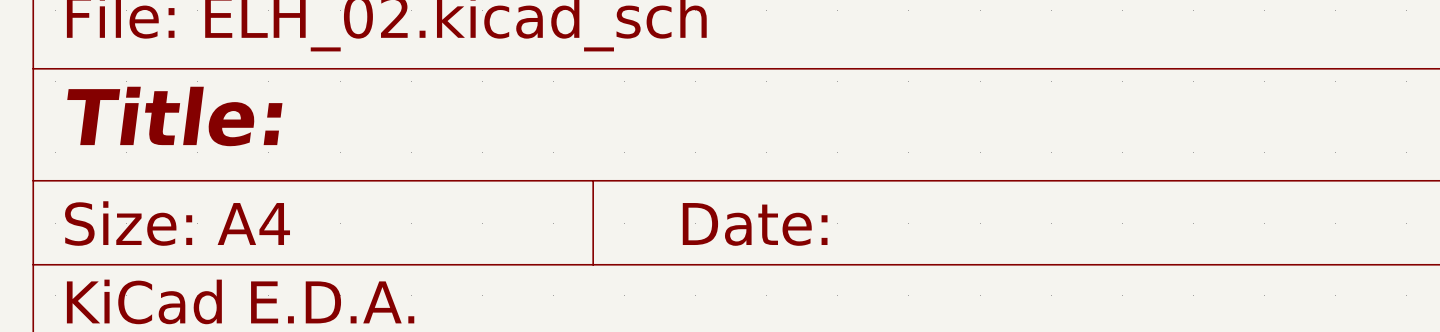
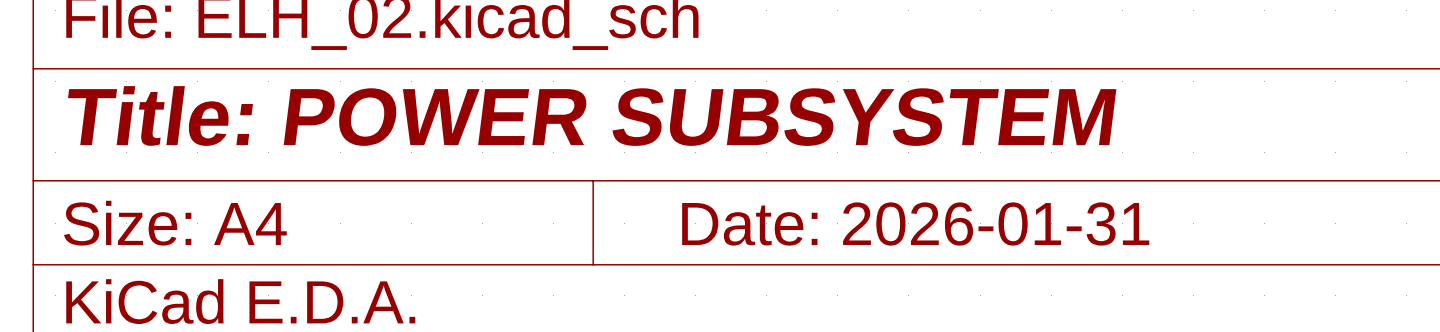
title block: Title: (174, 116) -> Title: POWER SUBSYSTEM (592, 116)
title block: Date: (755, 224) -> Date: 2026-01-31 (915, 224)

